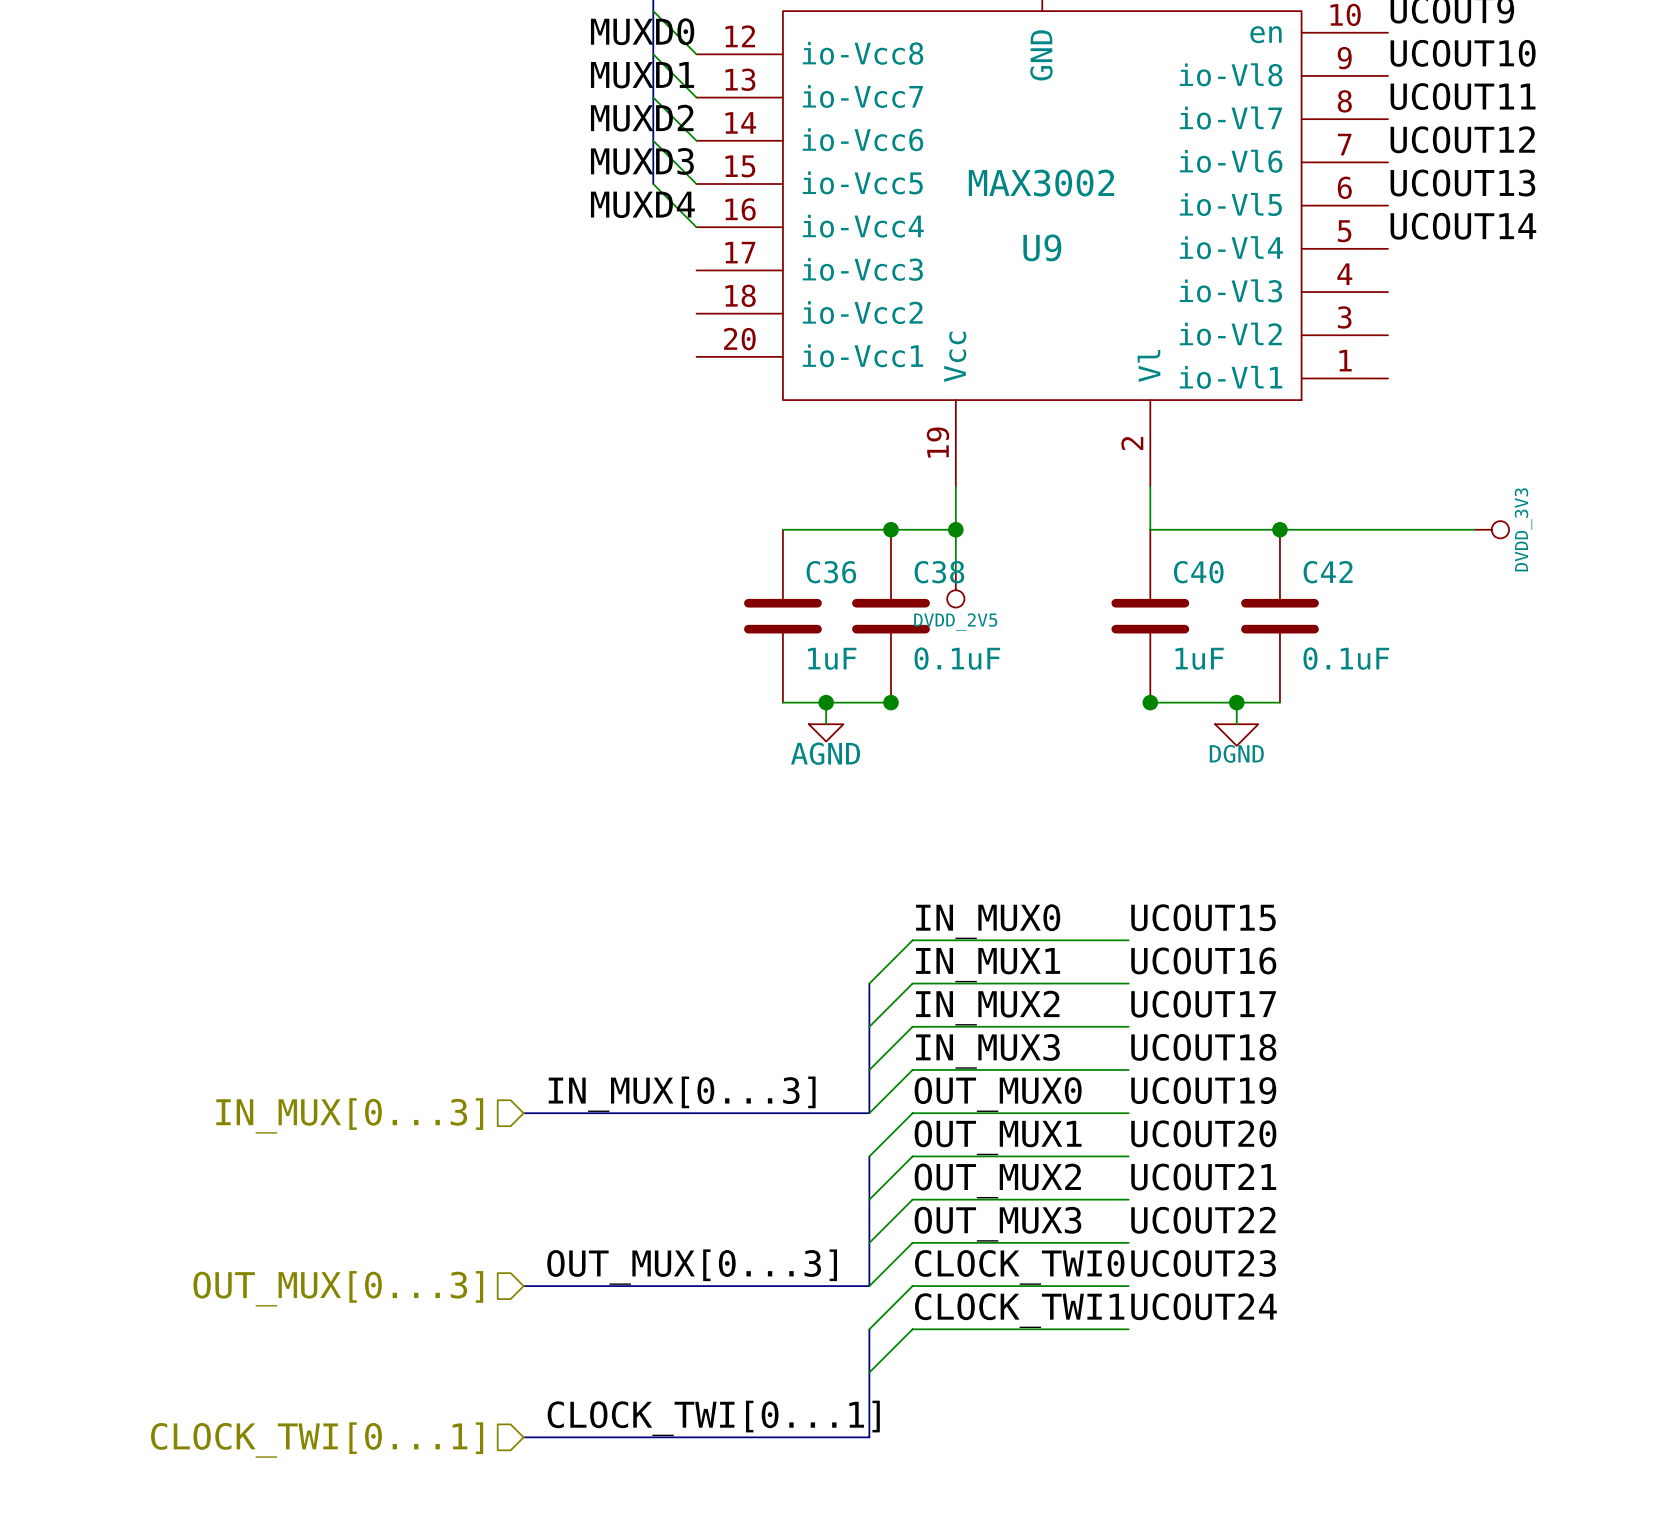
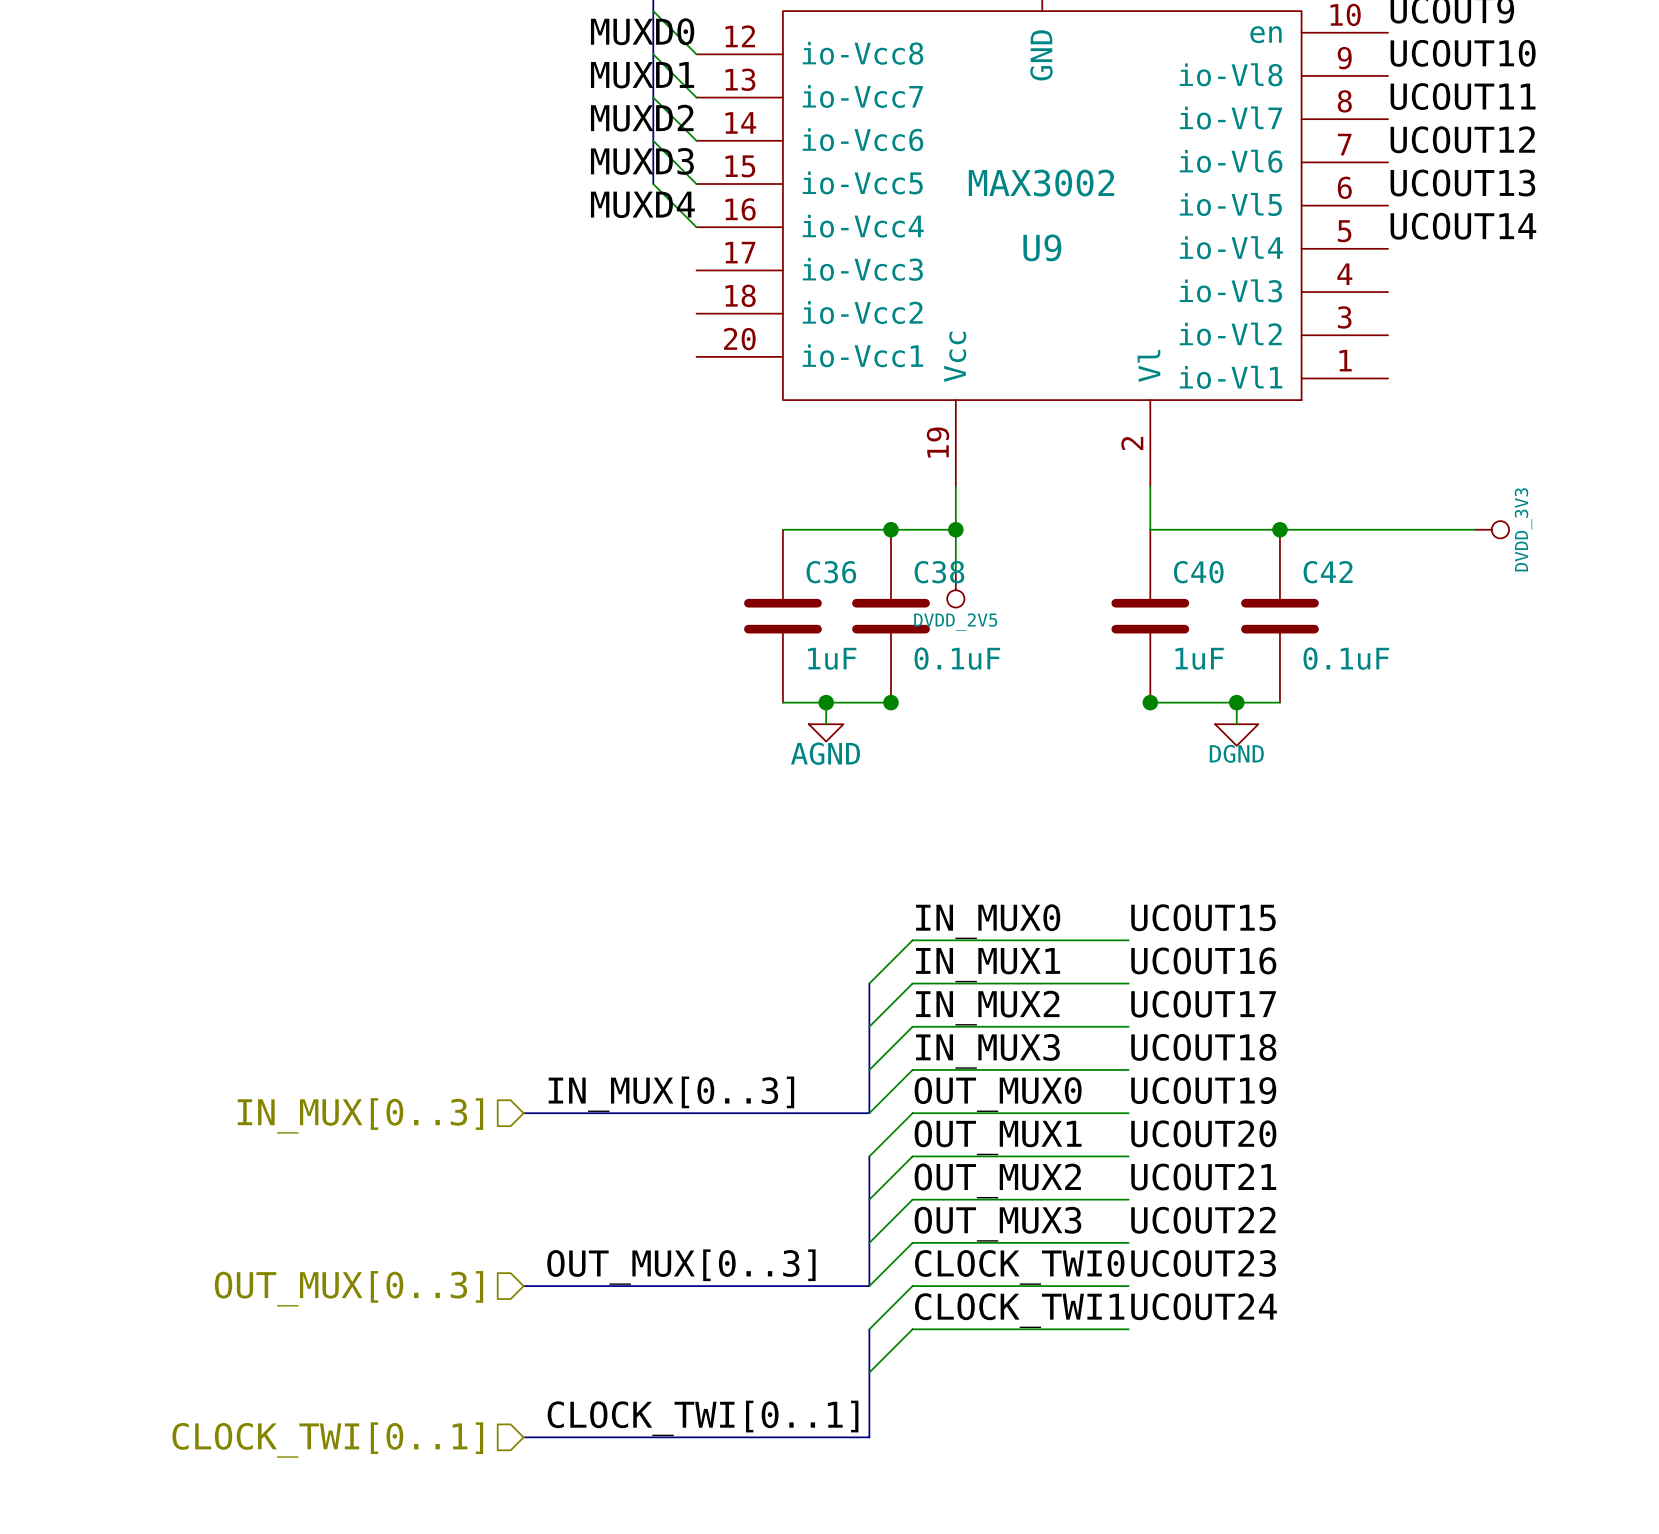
label: IN_MUX[0...3] (682, 1094) -> IN_MUX[0..3] (671, 1094)
hierarchical label: IN_MUX[0...3] (349, 1115) -> IN_MUX[0..3] (360, 1115)
label: OUT_MUX[0...3] (692, 1267) -> OUT_MUX[0..3] (681, 1267)
hierarchical label: OUT_MUX[0...3] (338, 1288) -> OUT_MUX[0..3] (349, 1288)
label: CLOCK_TWI[0...1] (713, 1418) -> CLOCK_TWI[0..1] (703, 1418)
hierarchical label: CLOCK_TWI[0...1] (317, 1440) -> CLOCK_TWI[0..1] (327, 1440)

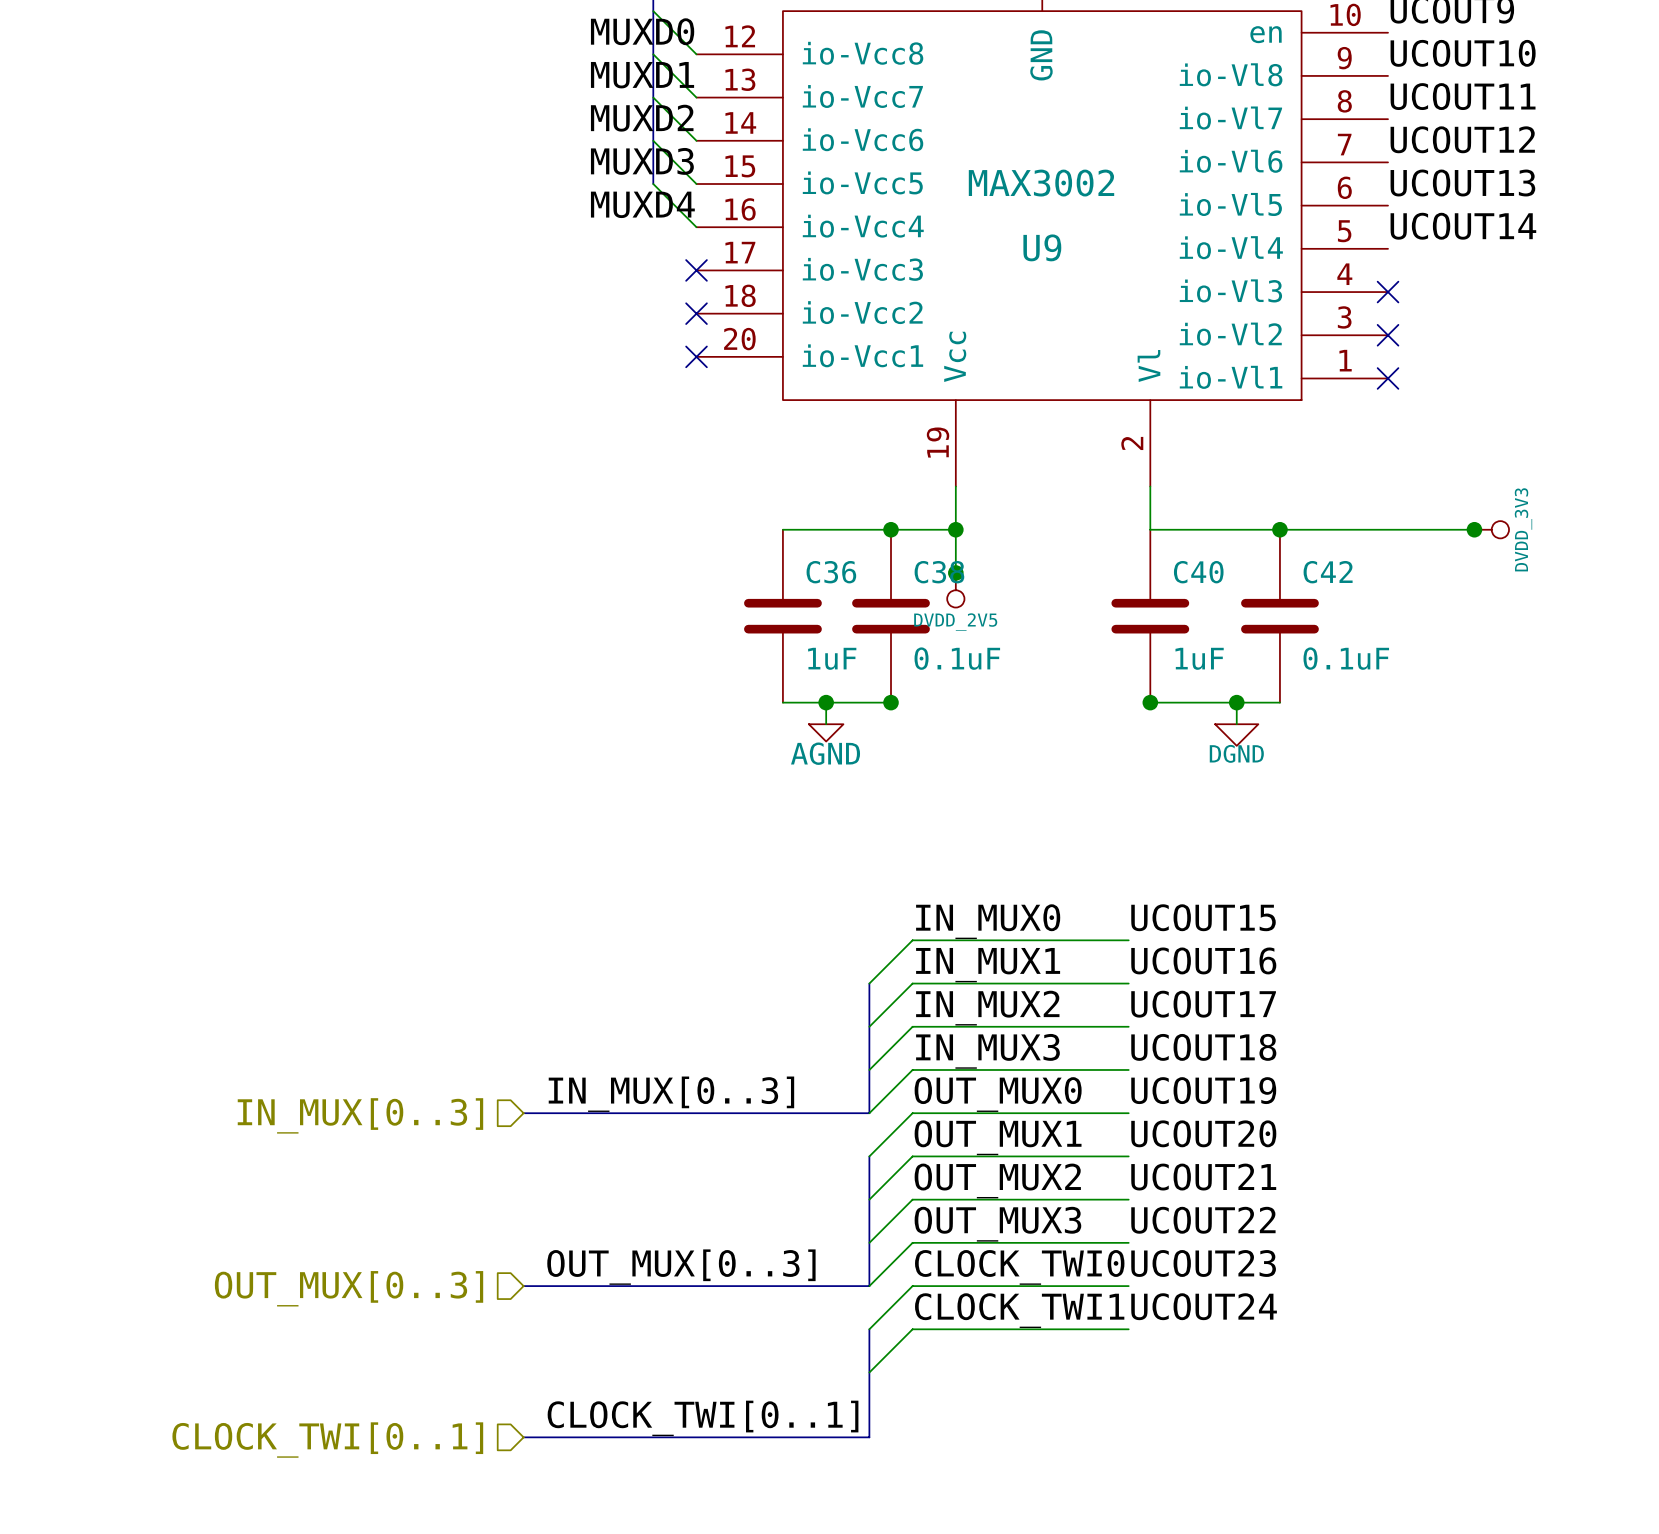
no-connect mark: none -> (696, 270)
no-connect mark: none -> (1388, 292)
no-connect mark: none -> (696, 313)
no-connect mark: none -> (1388, 335)
no-connect mark: none -> (696, 356)
no-connect mark: none -> (1388, 378)
junction: none -> (1474, 529)
junction: none -> (955, 572)

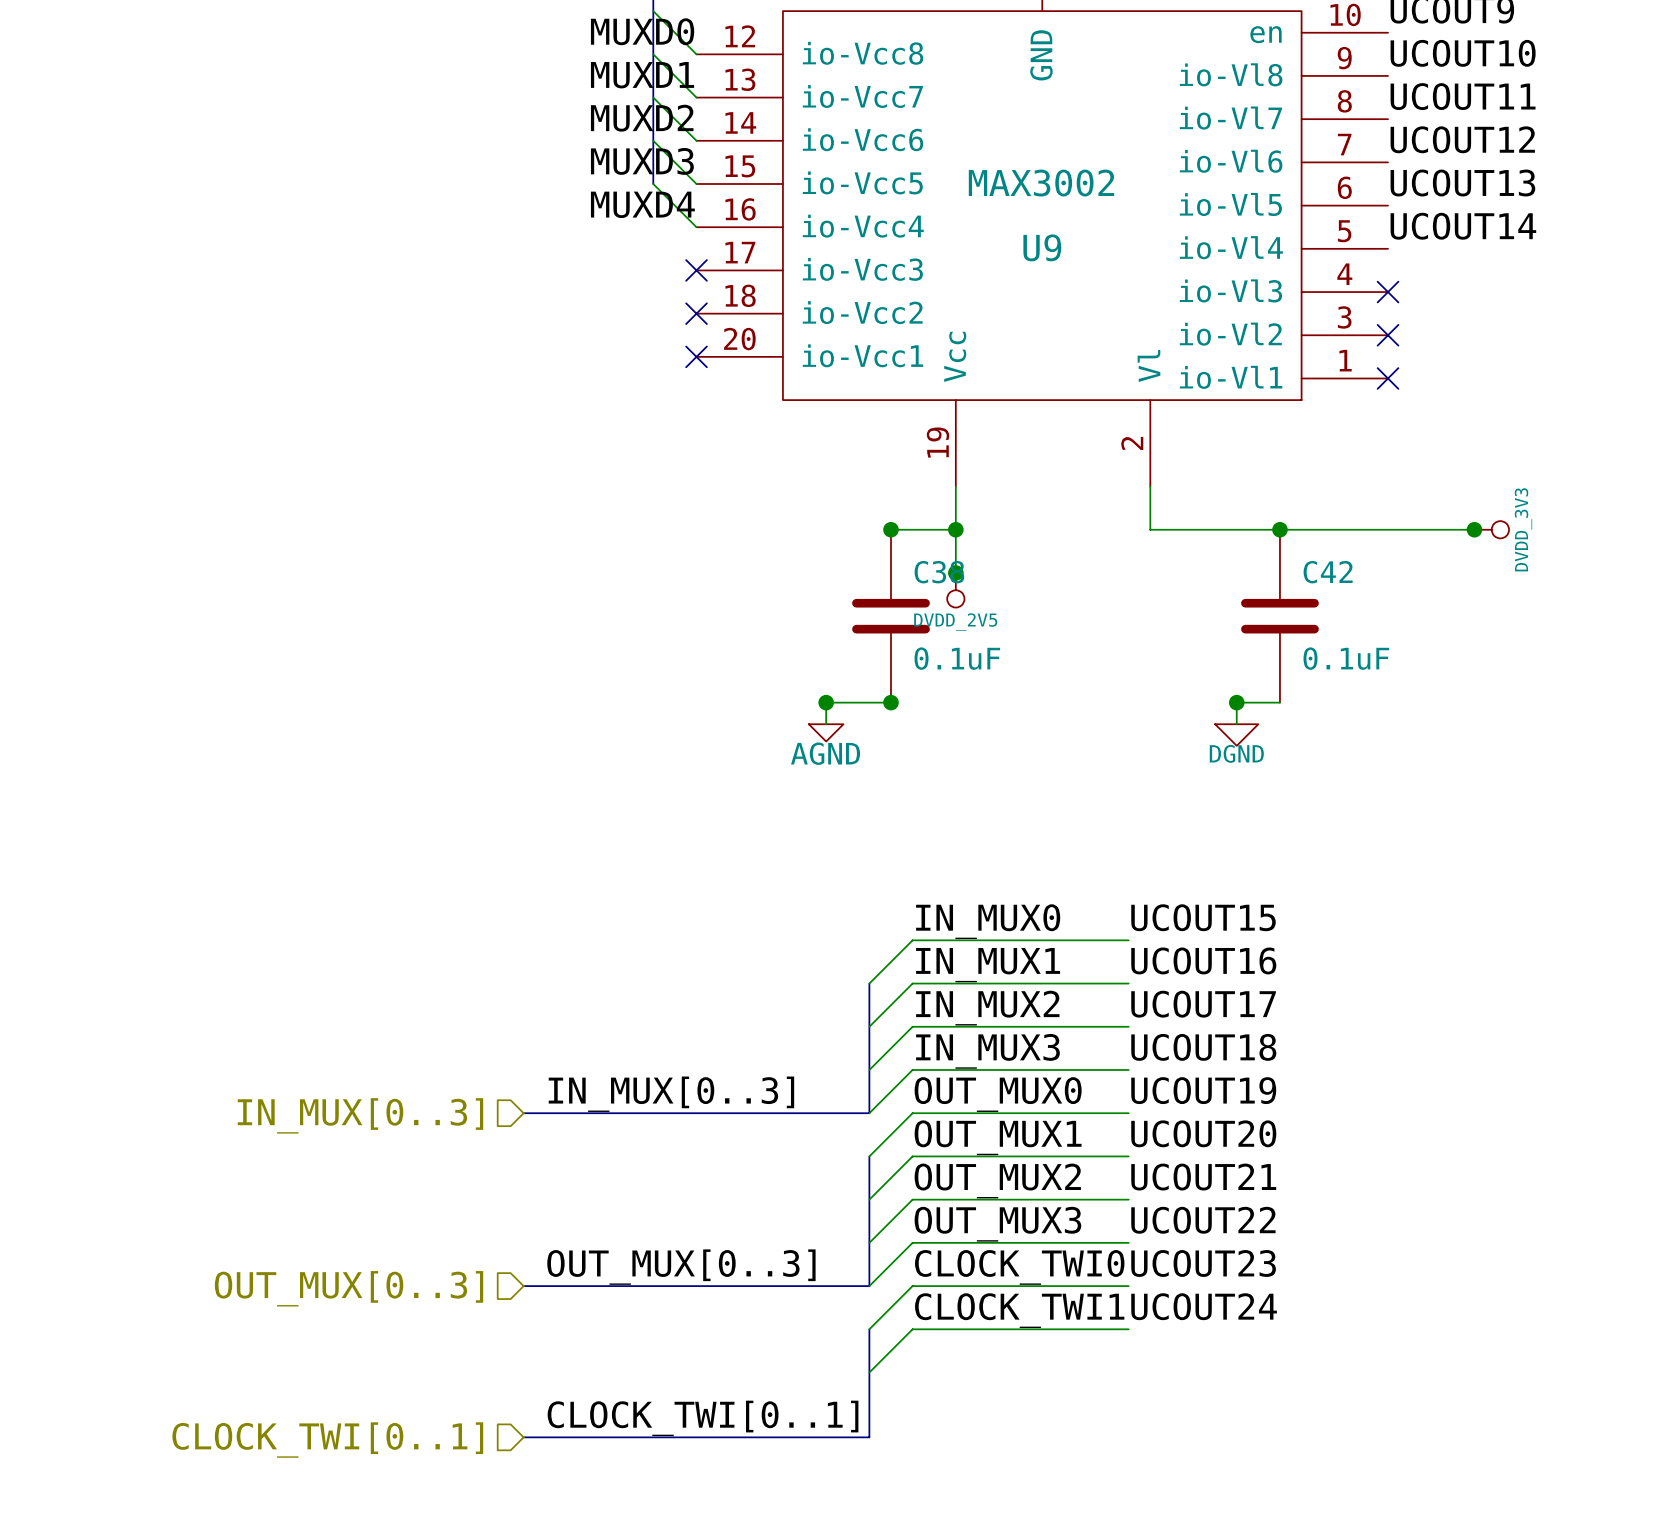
wire: (782, 529) (891, 529) -> none
C36: 1uF (782, 616) -> none
C40: 1uF (1150, 616) -> none
wire: (782, 702) (826, 702) -> none
wire: (1150, 702) (1236, 702) -> none
junction: (1150, 702) -> none

